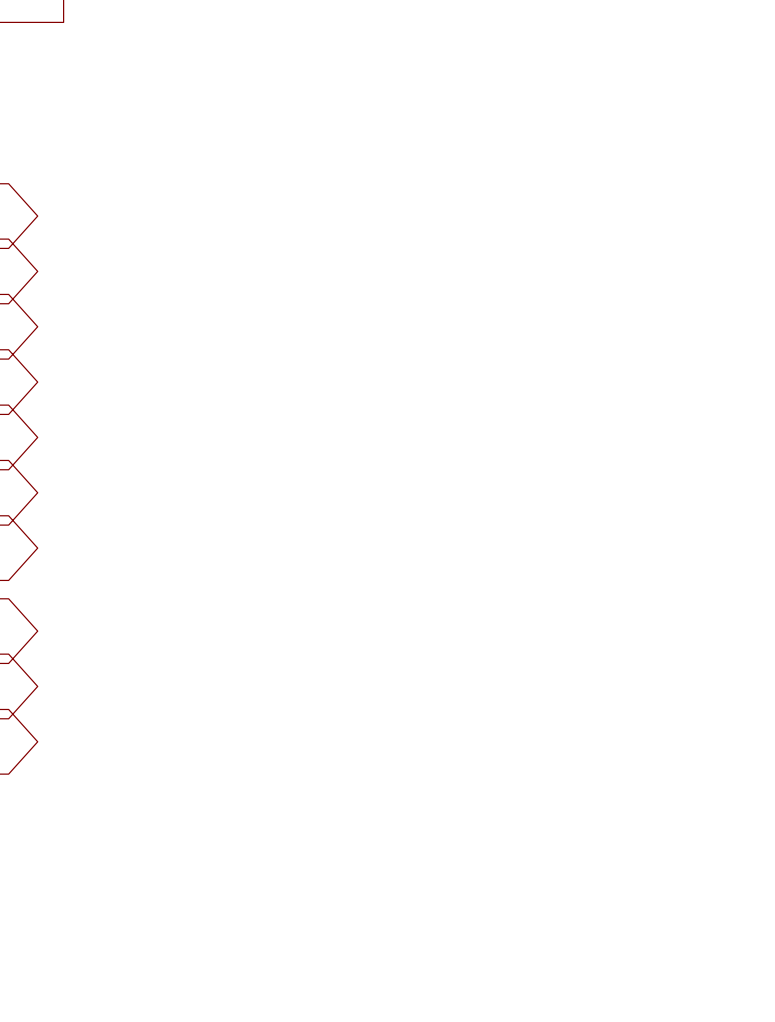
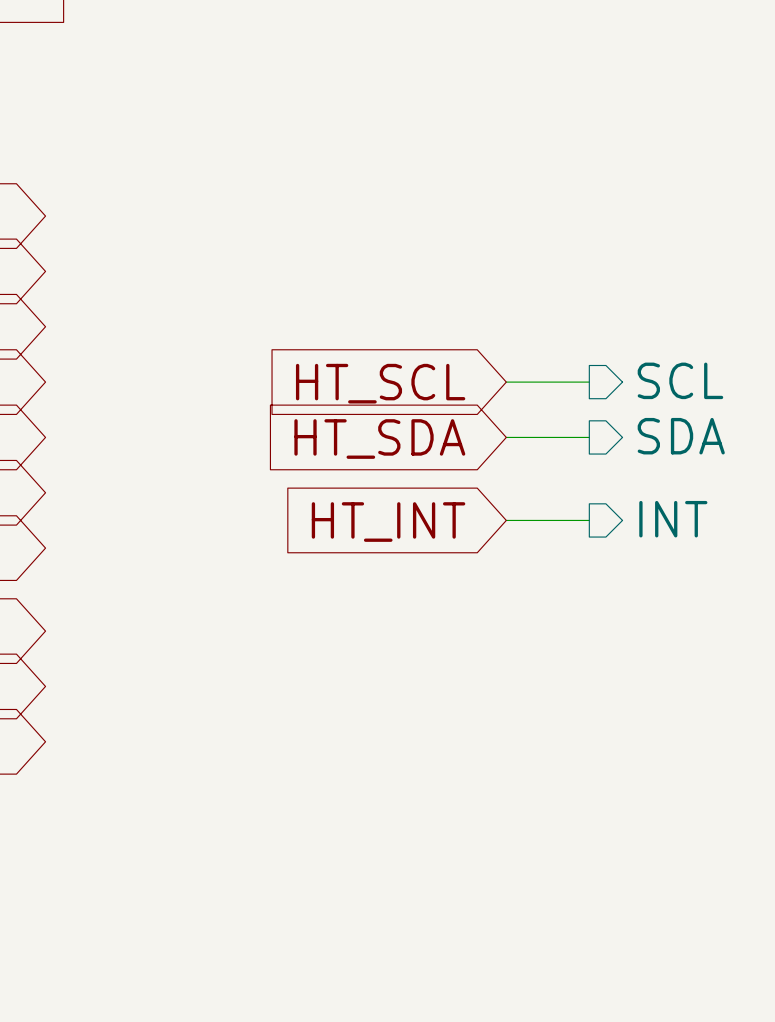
sheet pin: none -> SCL (680, 380)
wire: none -> (506, 382) (589, 382)
global label: none -> HT_SCL (380, 383)
sheet pin: none -> SDA (681, 436)
wire: none -> (506, 437) (589, 437)
global label: none -> HT_SDA (379, 439)
sheet pin: none -> INT (673, 519)
wire: none -> (506, 520) (589, 520)
global label: none -> HT_INT (388, 522)

